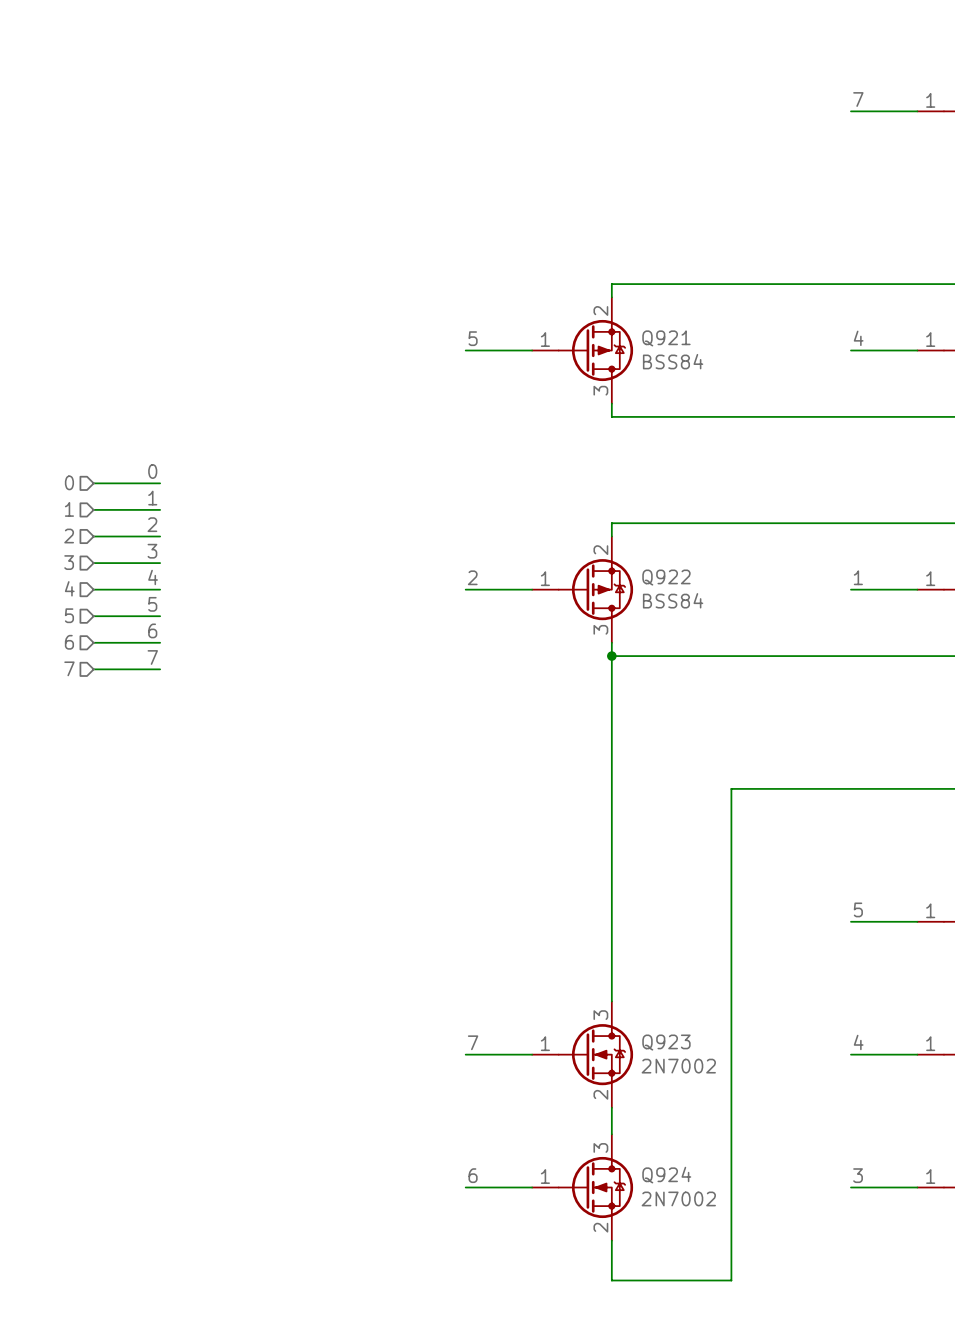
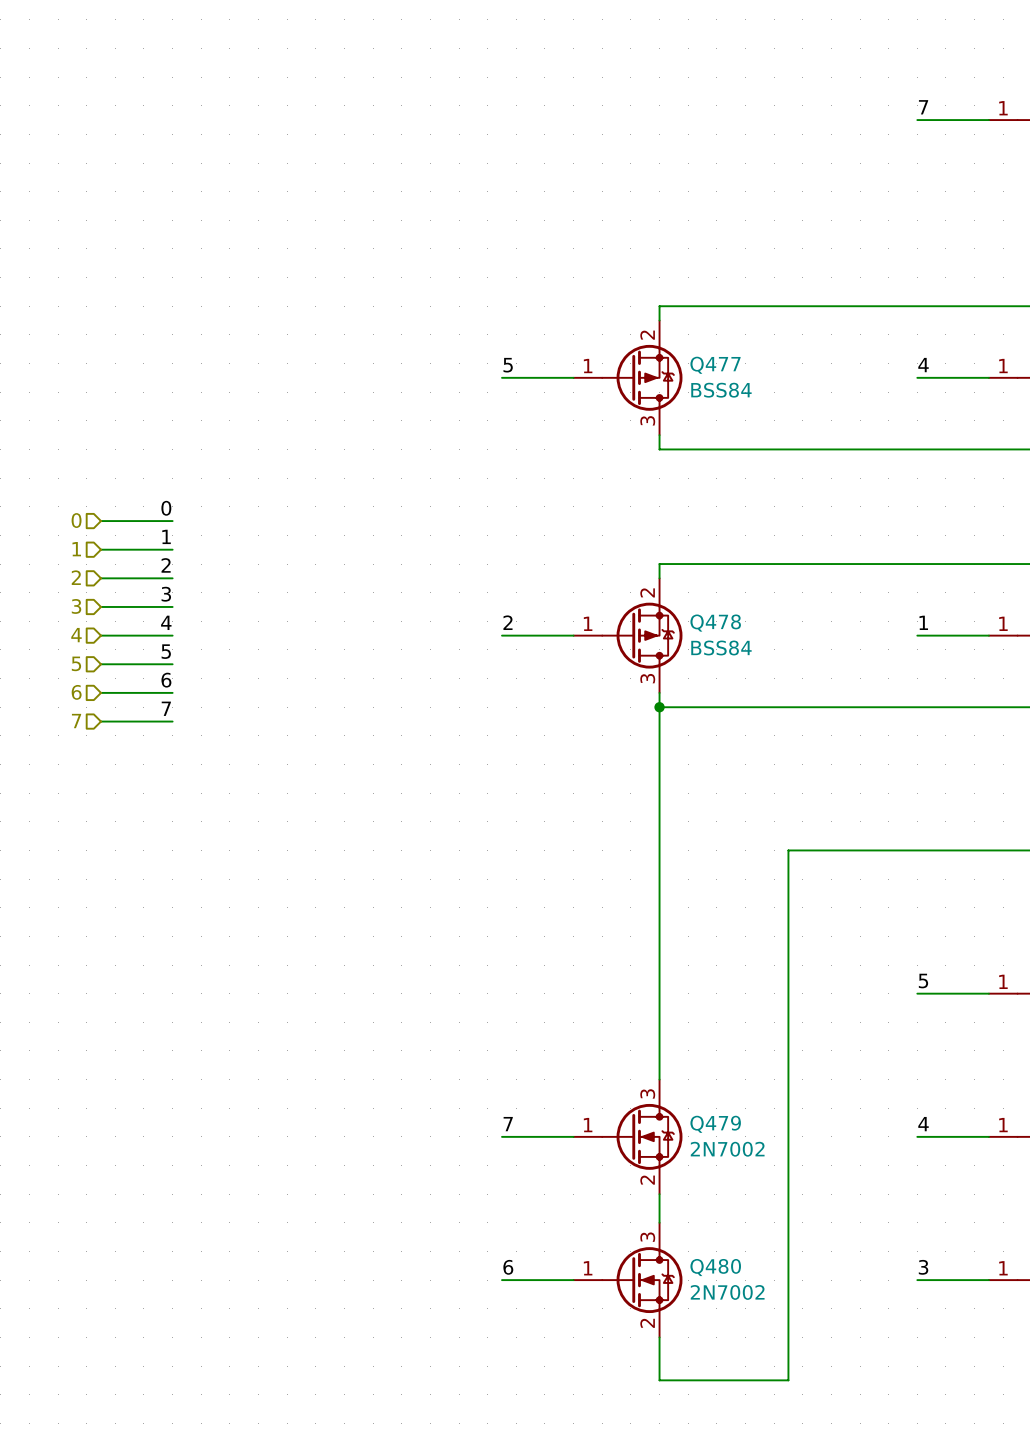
Q921 name: Q921 (666, 338) -> Q477 (715, 365)
Q922 name: Q922 (666, 577) -> Q478 (715, 623)
Q923 name: Q923 (666, 1042) -> Q479 (715, 1124)
Q924 name: Q924 (666, 1175) -> Q480 (715, 1267)

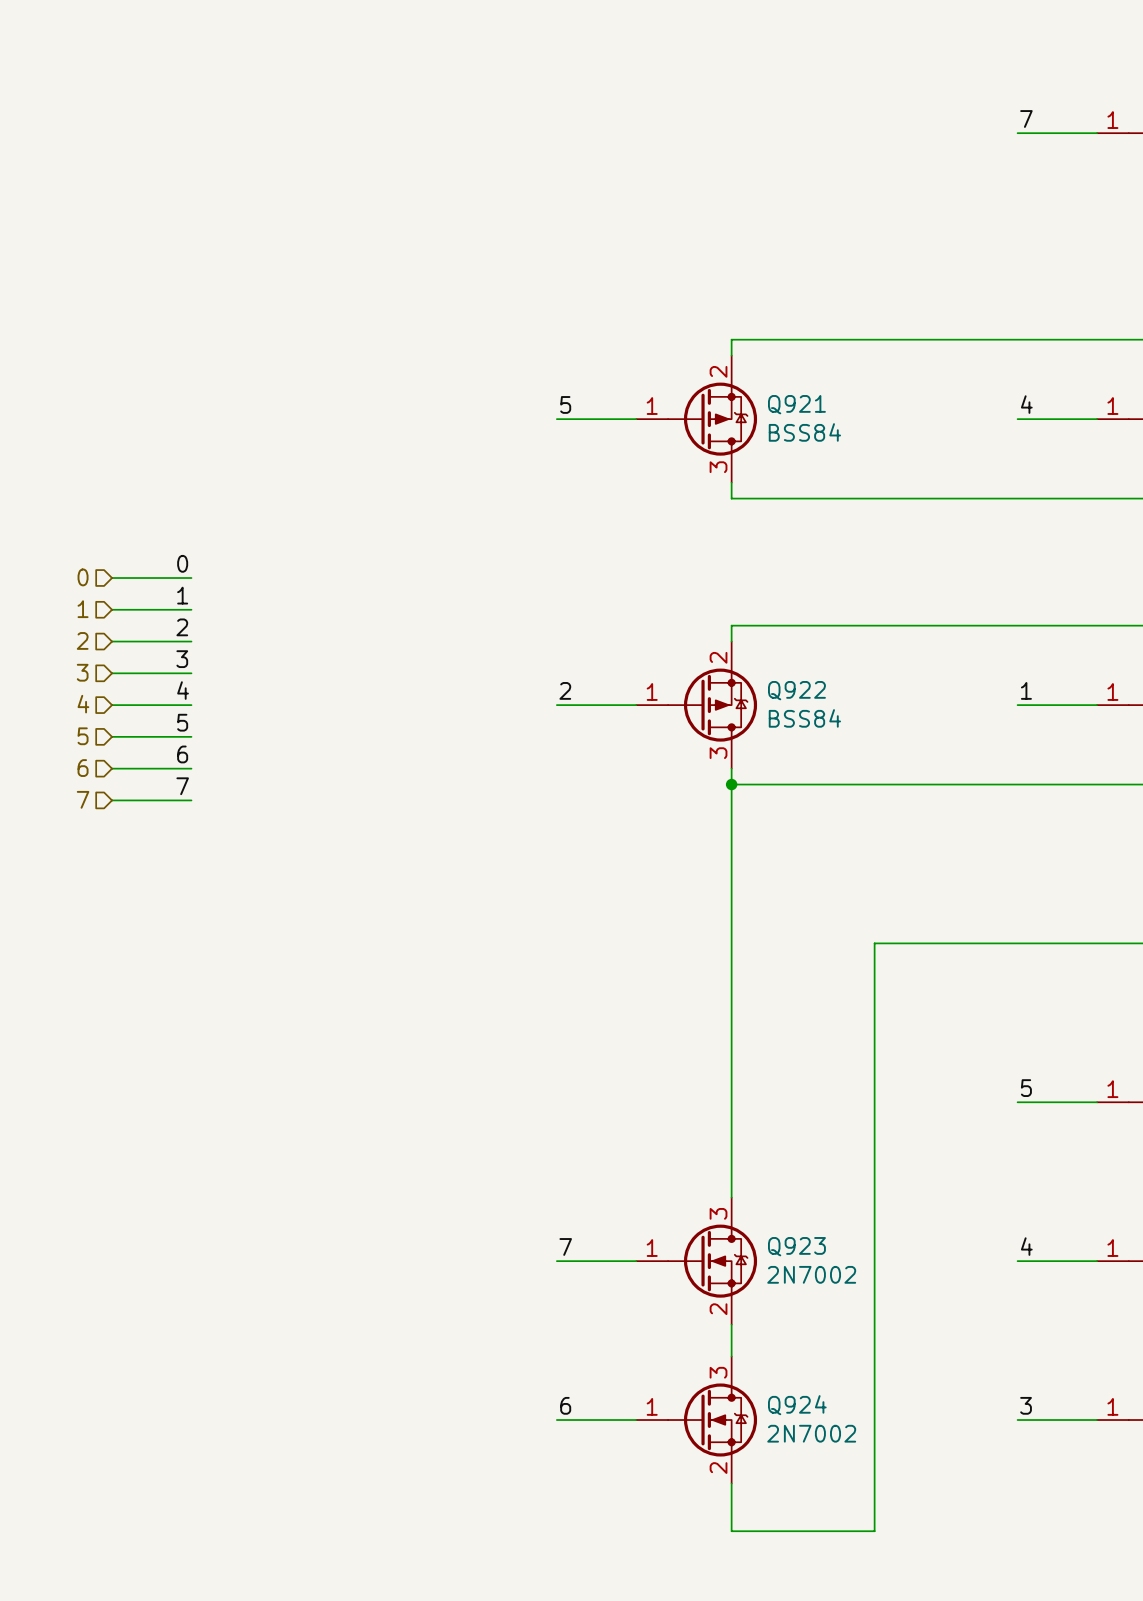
Q477 name: Q477 (715, 365) -> Q921 (796, 404)
Q478 name: Q478 (715, 623) -> Q922 (796, 690)
Q479 name: Q479 (715, 1124) -> Q923 (796, 1246)
Q480 name: Q480 (715, 1267) -> Q924 (797, 1405)

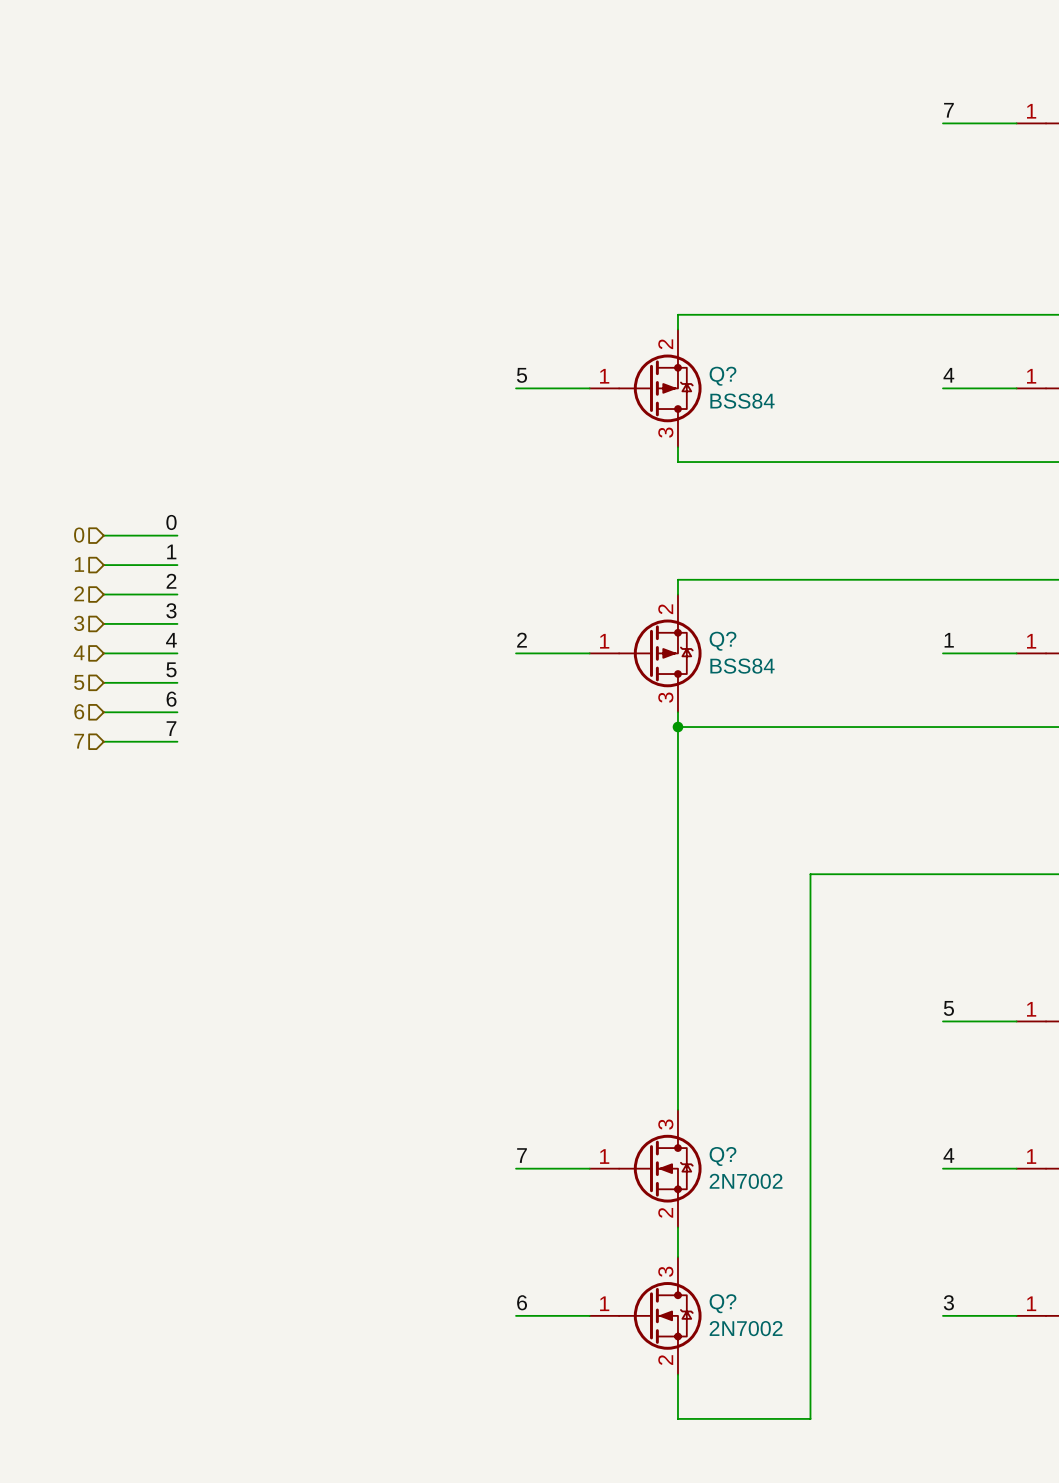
Q921 name: Q921 (796, 404) -> Q? (722, 376)
Q922 name: Q922 (796, 690) -> Q? (722, 641)
Q923 name: Q923 (796, 1246) -> Q? (722, 1156)
Q924 name: Q924 (797, 1405) -> Q? (722, 1303)

